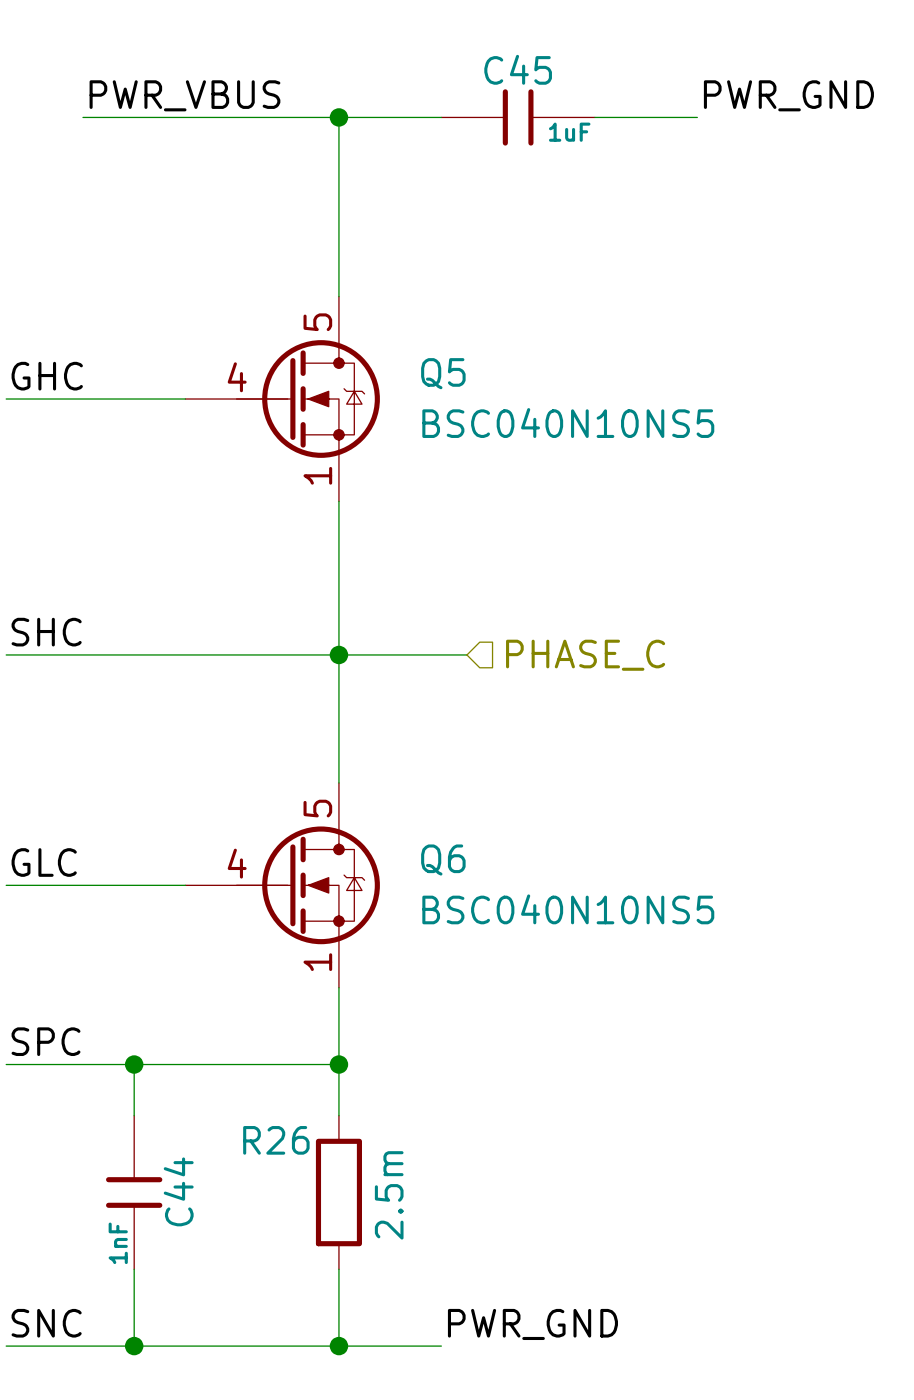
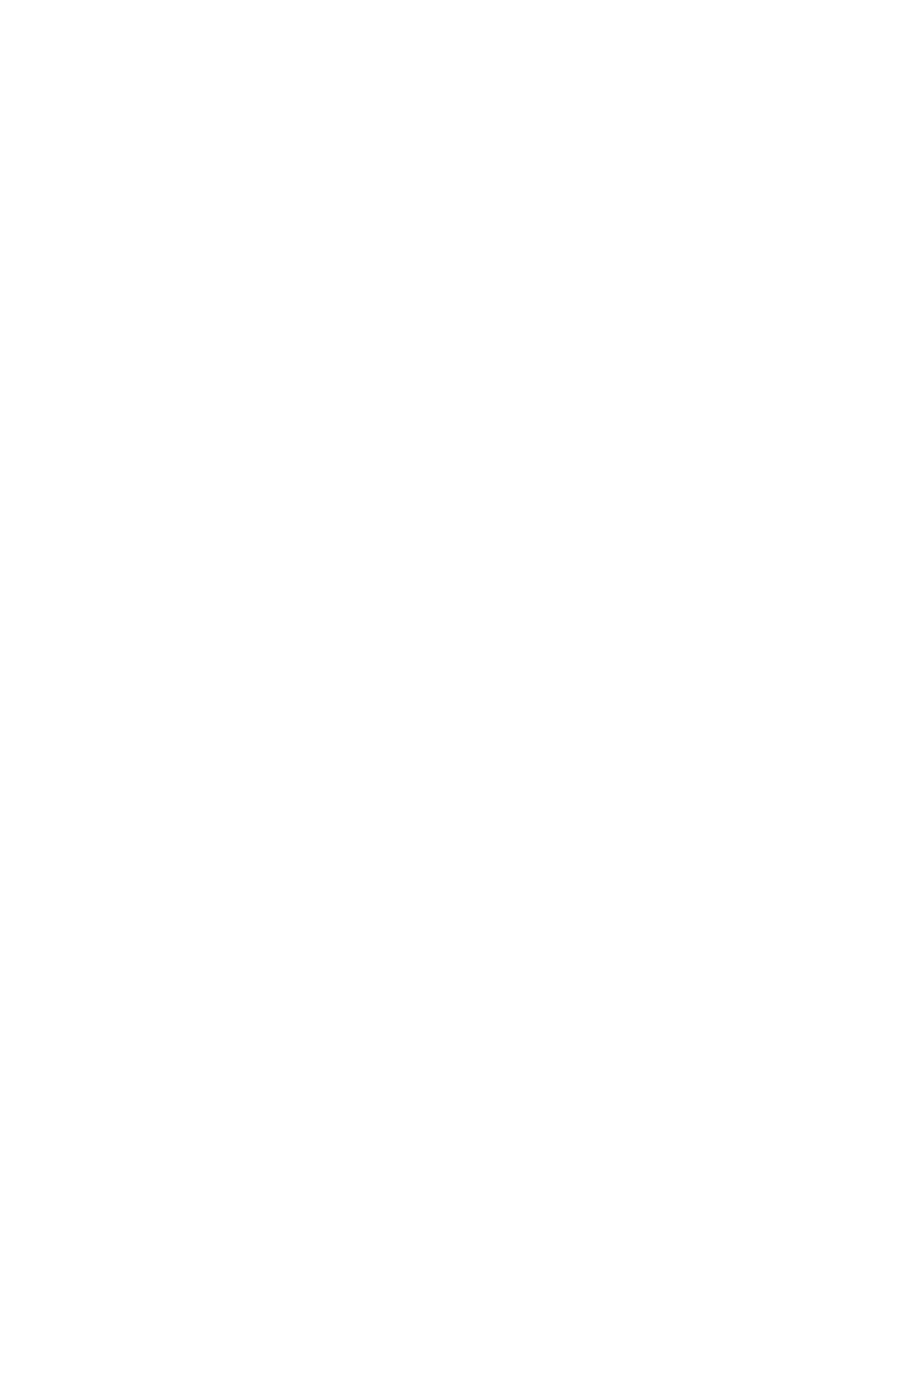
label: PWR_VBUS (184, 95) -> none
label: PWR_GND (788, 95) -> none
wire: (82, 117) (441, 117) -> none
wire: (338, 117) (338, 296) -> none
junction: (338, 117) -> none
C45: 1uF (518, 117) -> none
wire: (594, 117) (697, 117) -> none
label: GHC (47, 376) -> none
wire: (6, 399) (185, 399) -> none
Q5: BSC040N10NS5 (282, 399) -> none
wire: (338, 501) (338, 782) -> none
label: SHC (46, 632) -> none
wire: (6, 654) (466, 654) -> none
junction: (338, 654) -> none
hierarchical label: PHASE_C (585, 655) -> none
label: GLC (44, 862) -> none
wire: (6, 885) (185, 885) -> none
Q6: BSC040N10NS5 (282, 885) -> none
wire: (338, 987) (338, 1115) -> none
label: SPC (46, 1041) -> none
wire: (6, 1064) (338, 1064) -> none
wire: (134, 1064) (134, 1115) -> none
junction: (134, 1064) -> none
junction: (338, 1064) -> none
C44: 1nF (134, 1192) -> none
R26: 2.5m (338, 1192) -> none
wire: (134, 1269) (134, 1346) -> none
wire: (338, 1269) (338, 1346) -> none
label: SNC (46, 1323) -> none
label: PWR_GND (532, 1324) -> none
wire: (6, 1346) (441, 1346) -> none
junction: (134, 1346) -> none
junction: (338, 1346) -> none

